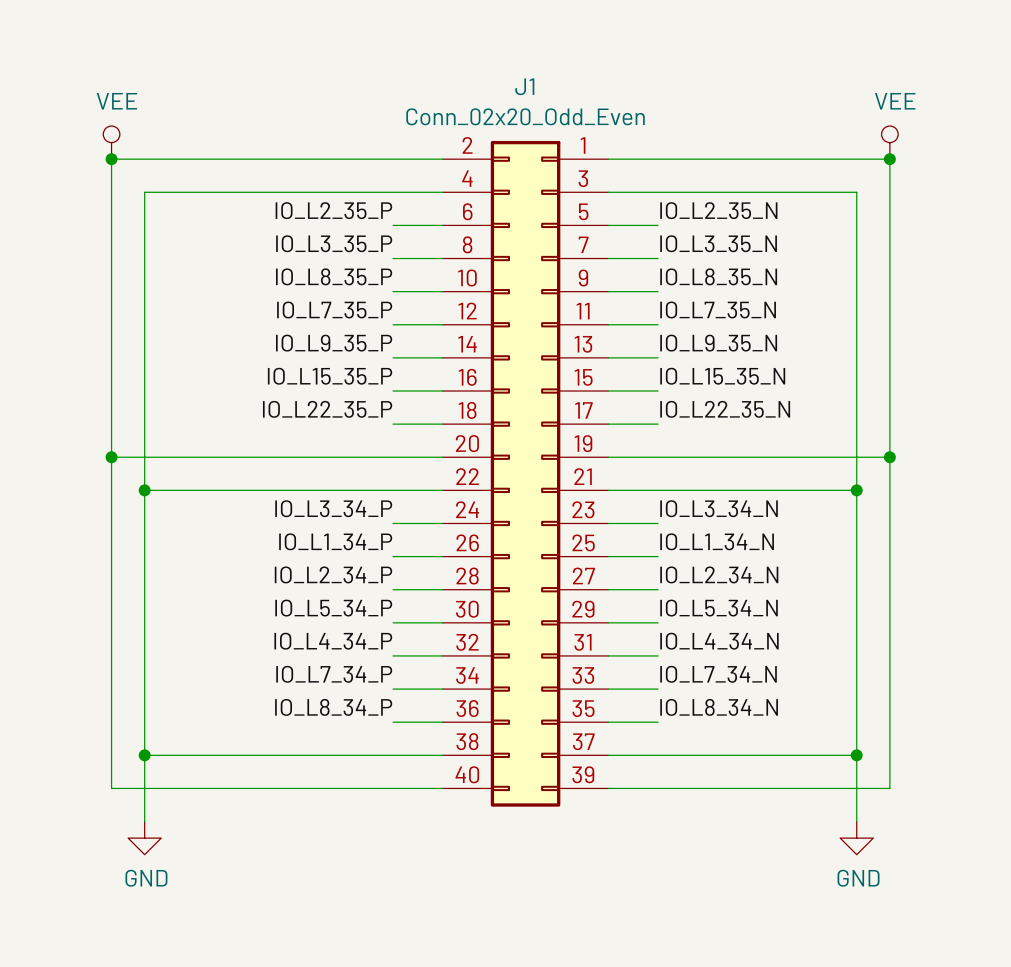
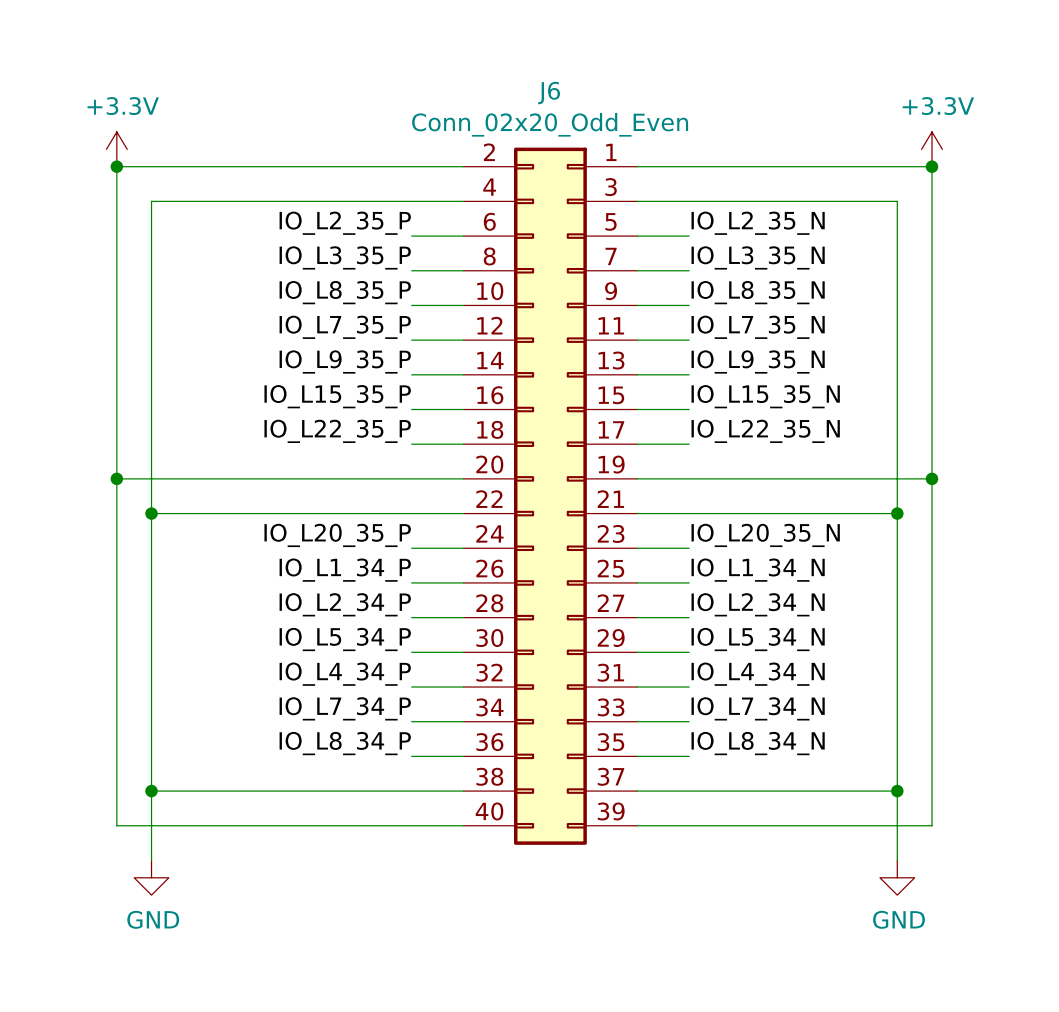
J1 name: J1 (524, 86) -> J6 (549, 93)
power symbol: VEE (111, 142) -> +3.3V (116, 149)
power symbol: VEE (889, 142) -> +3.3V (931, 149)
label: IO_L3_34_P (333, 508) -> IO_L20_35_P (337, 535)
label: IO_L3_34_N (719, 508) -> IO_L20_35_N (765, 535)

